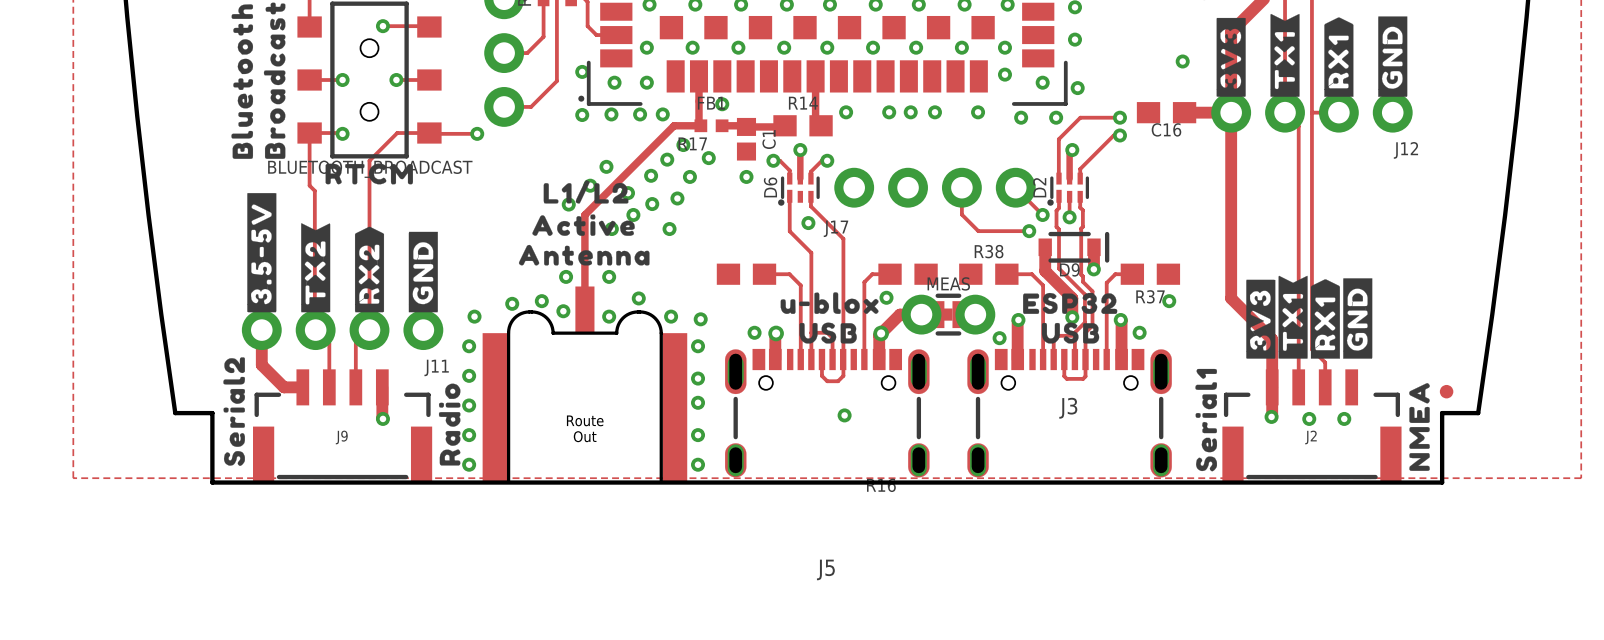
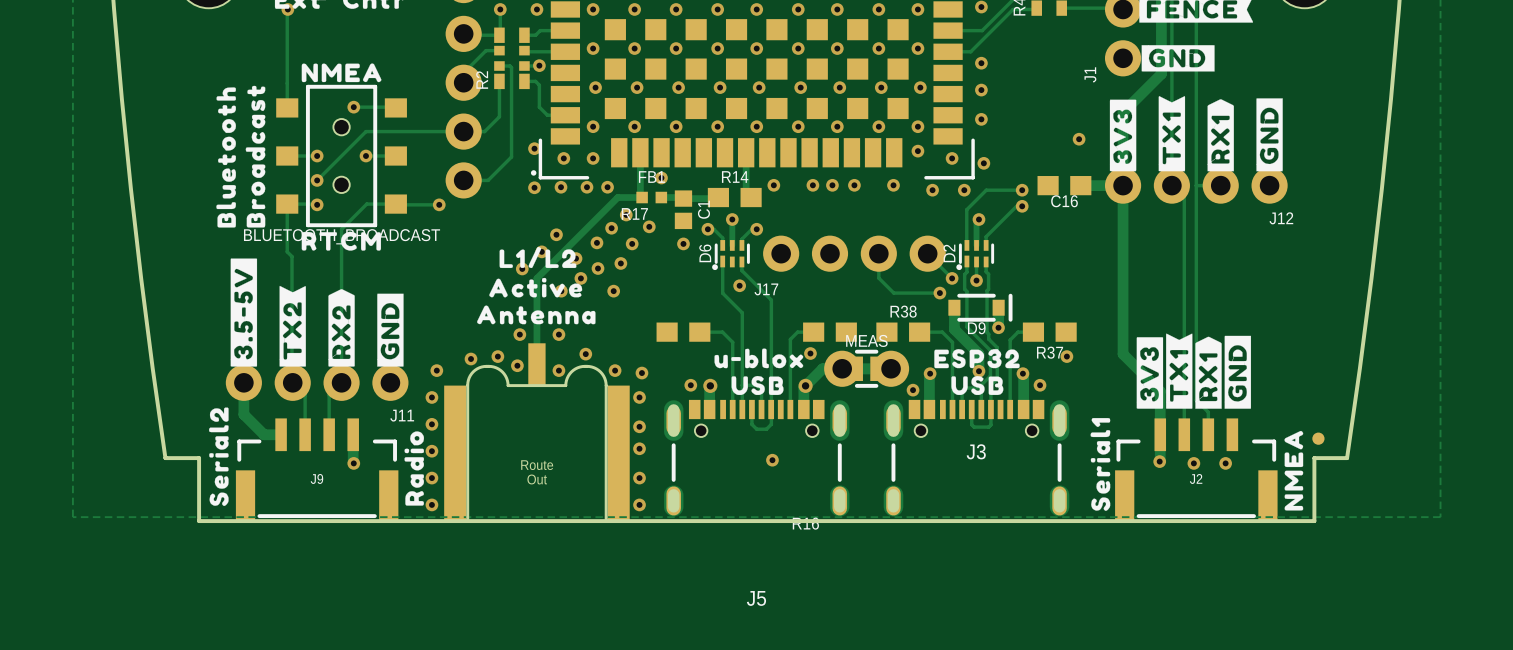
track: none -> (463, 131) (365, 131) (317, 180)
via: none -> (317, 180)

